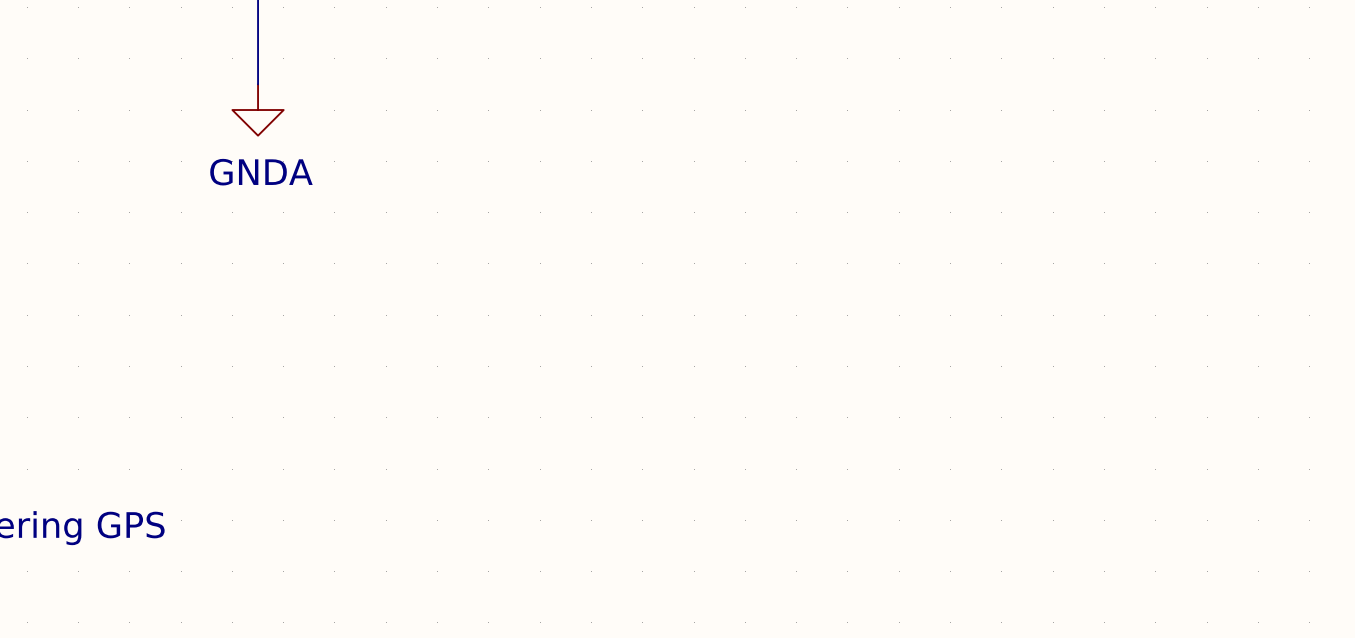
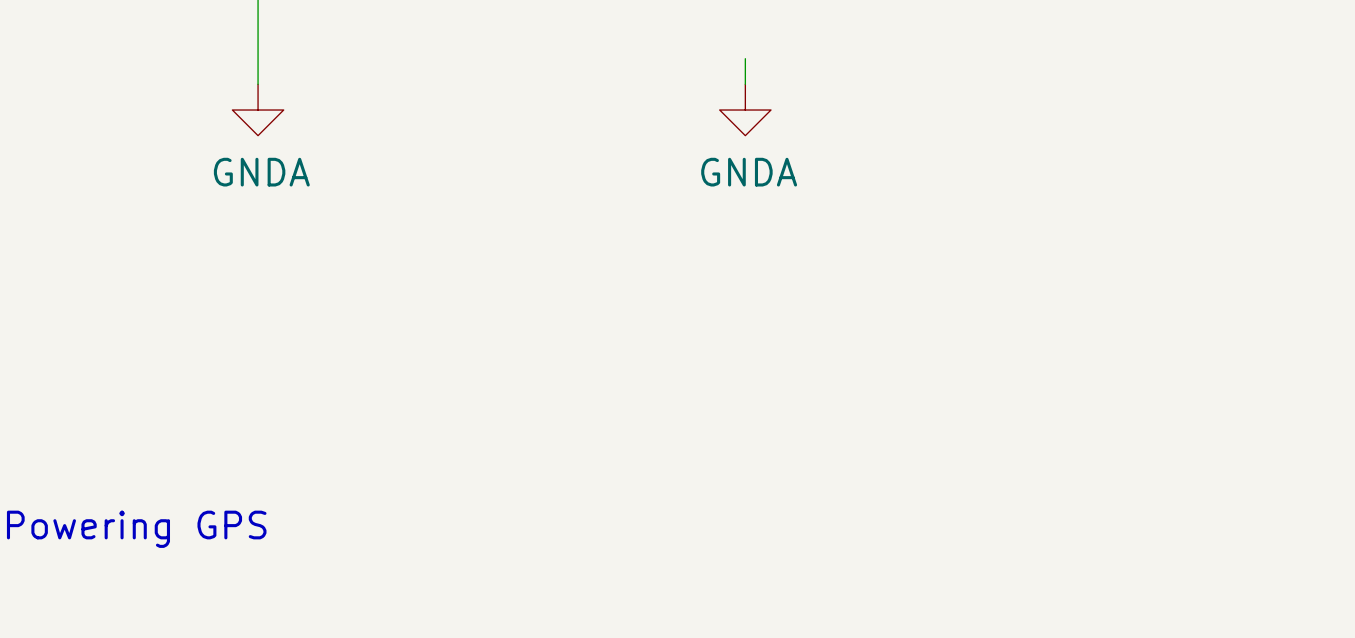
wire: none -> (745, 58) (745, 84)
power symbol: none -> GNDA (745, 110)

